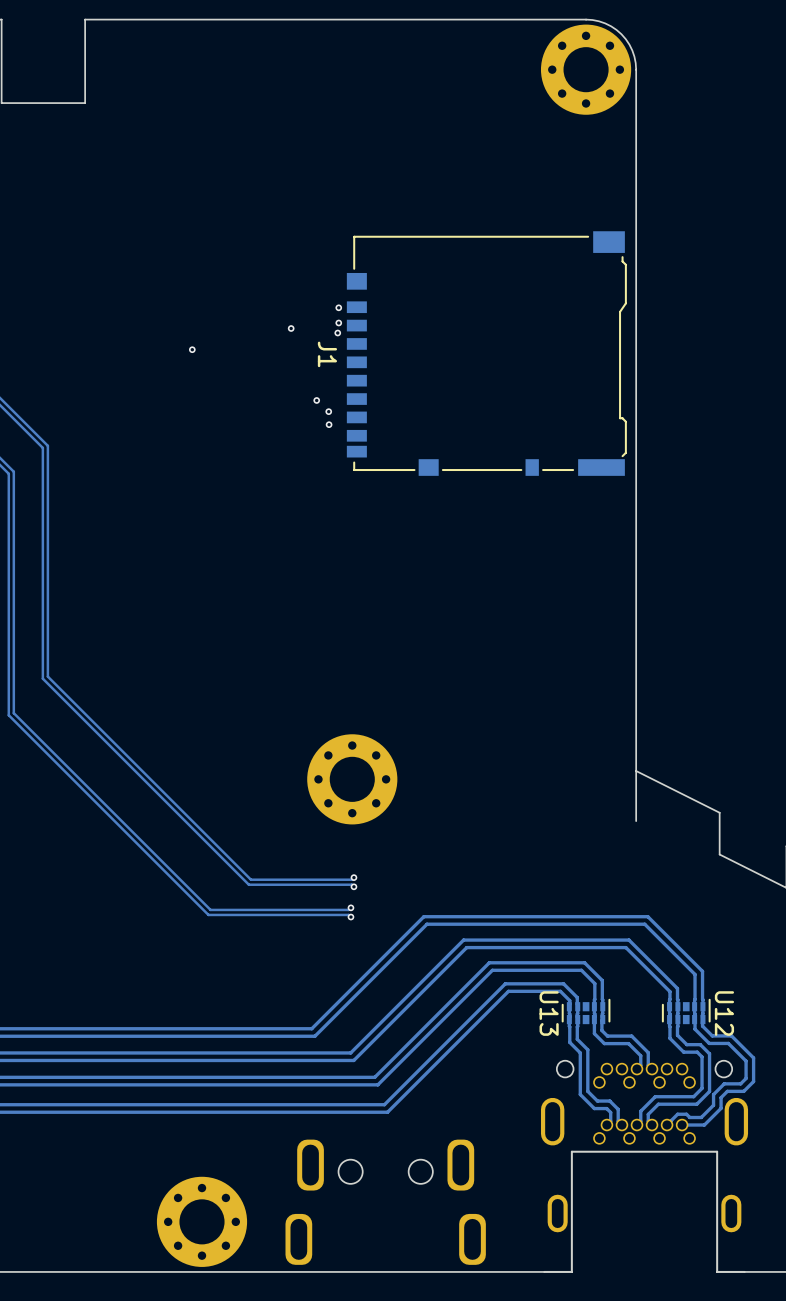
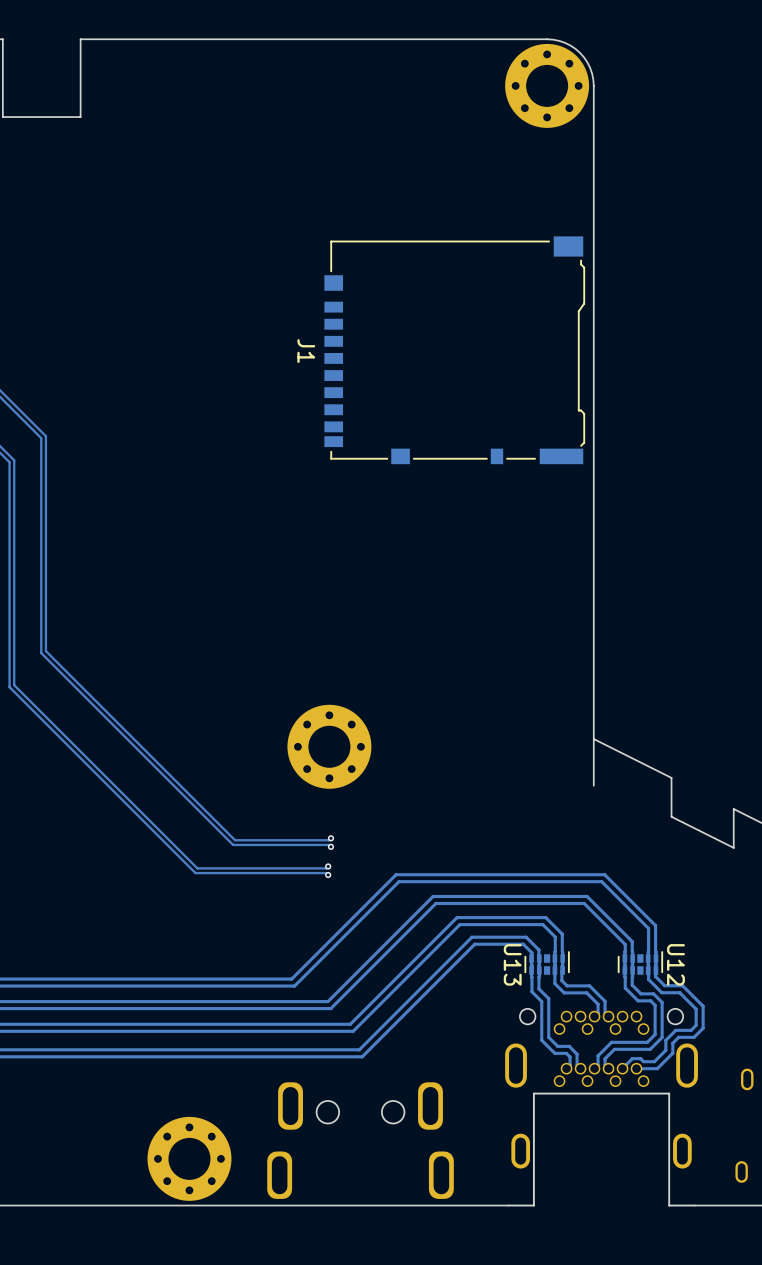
via: (338, 307) -> none
via: (338, 322) -> none
via: (291, 328) -> none
via: (337, 333) -> none
via: (192, 349) -> none
via: (316, 400) -> none
via: (328, 411) -> none
via: (329, 424) -> none

